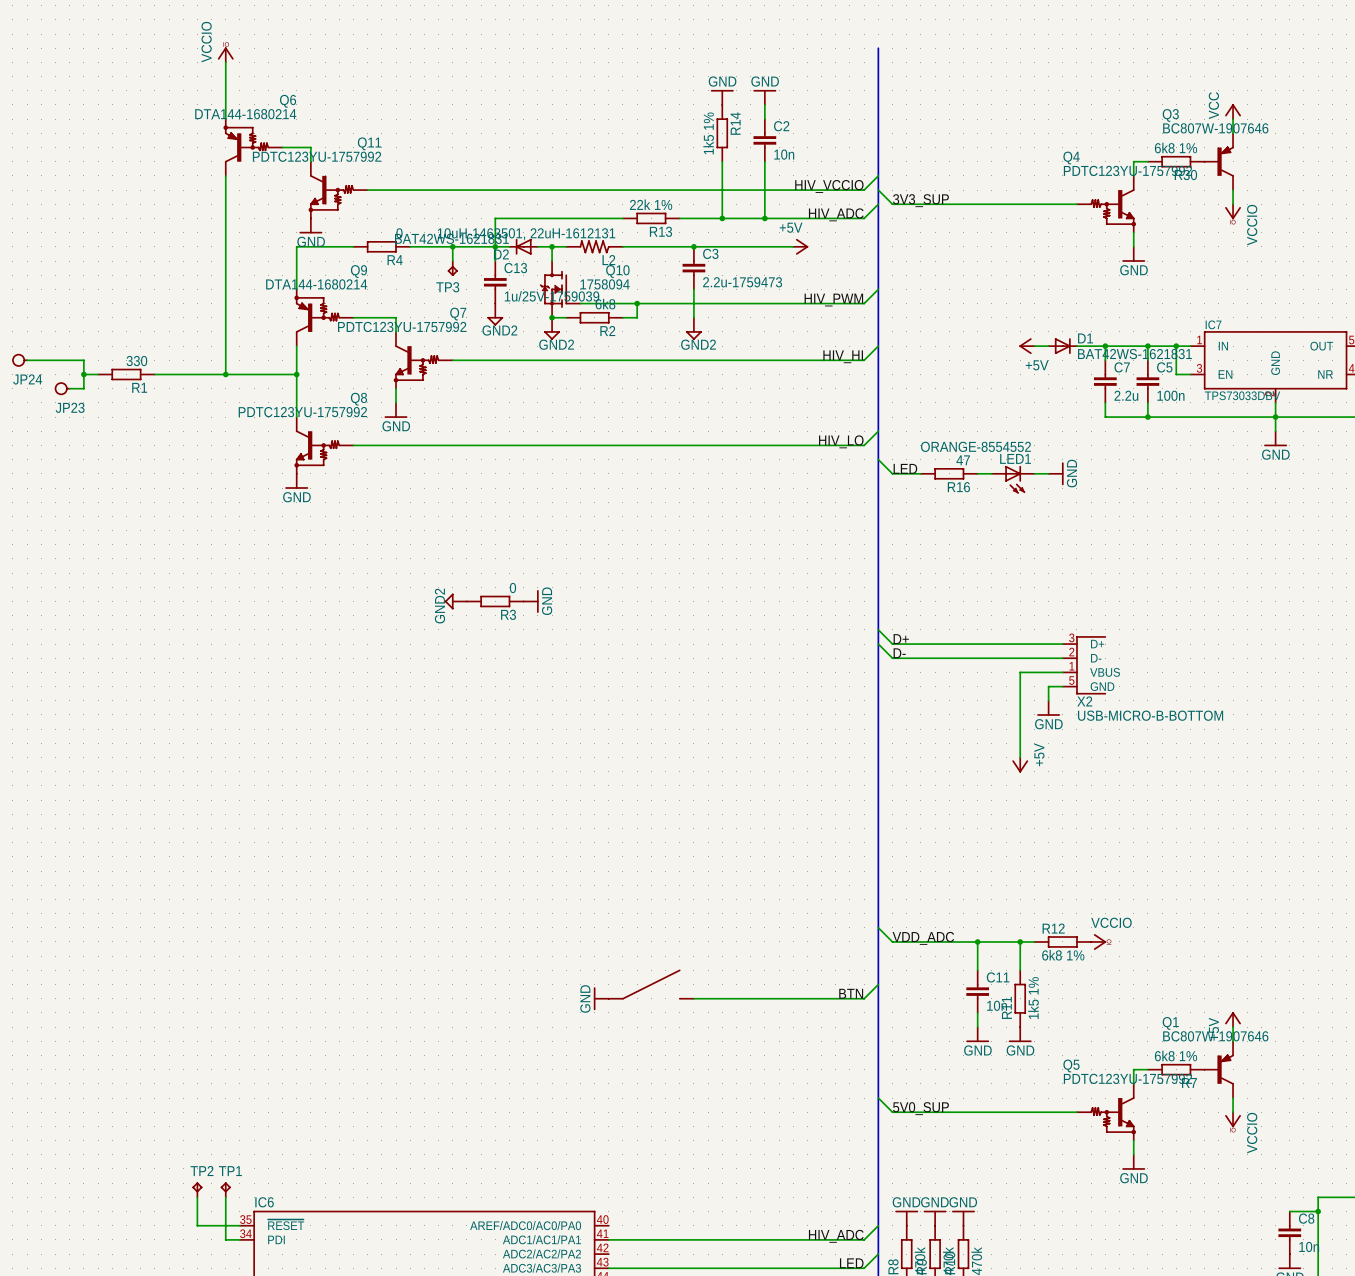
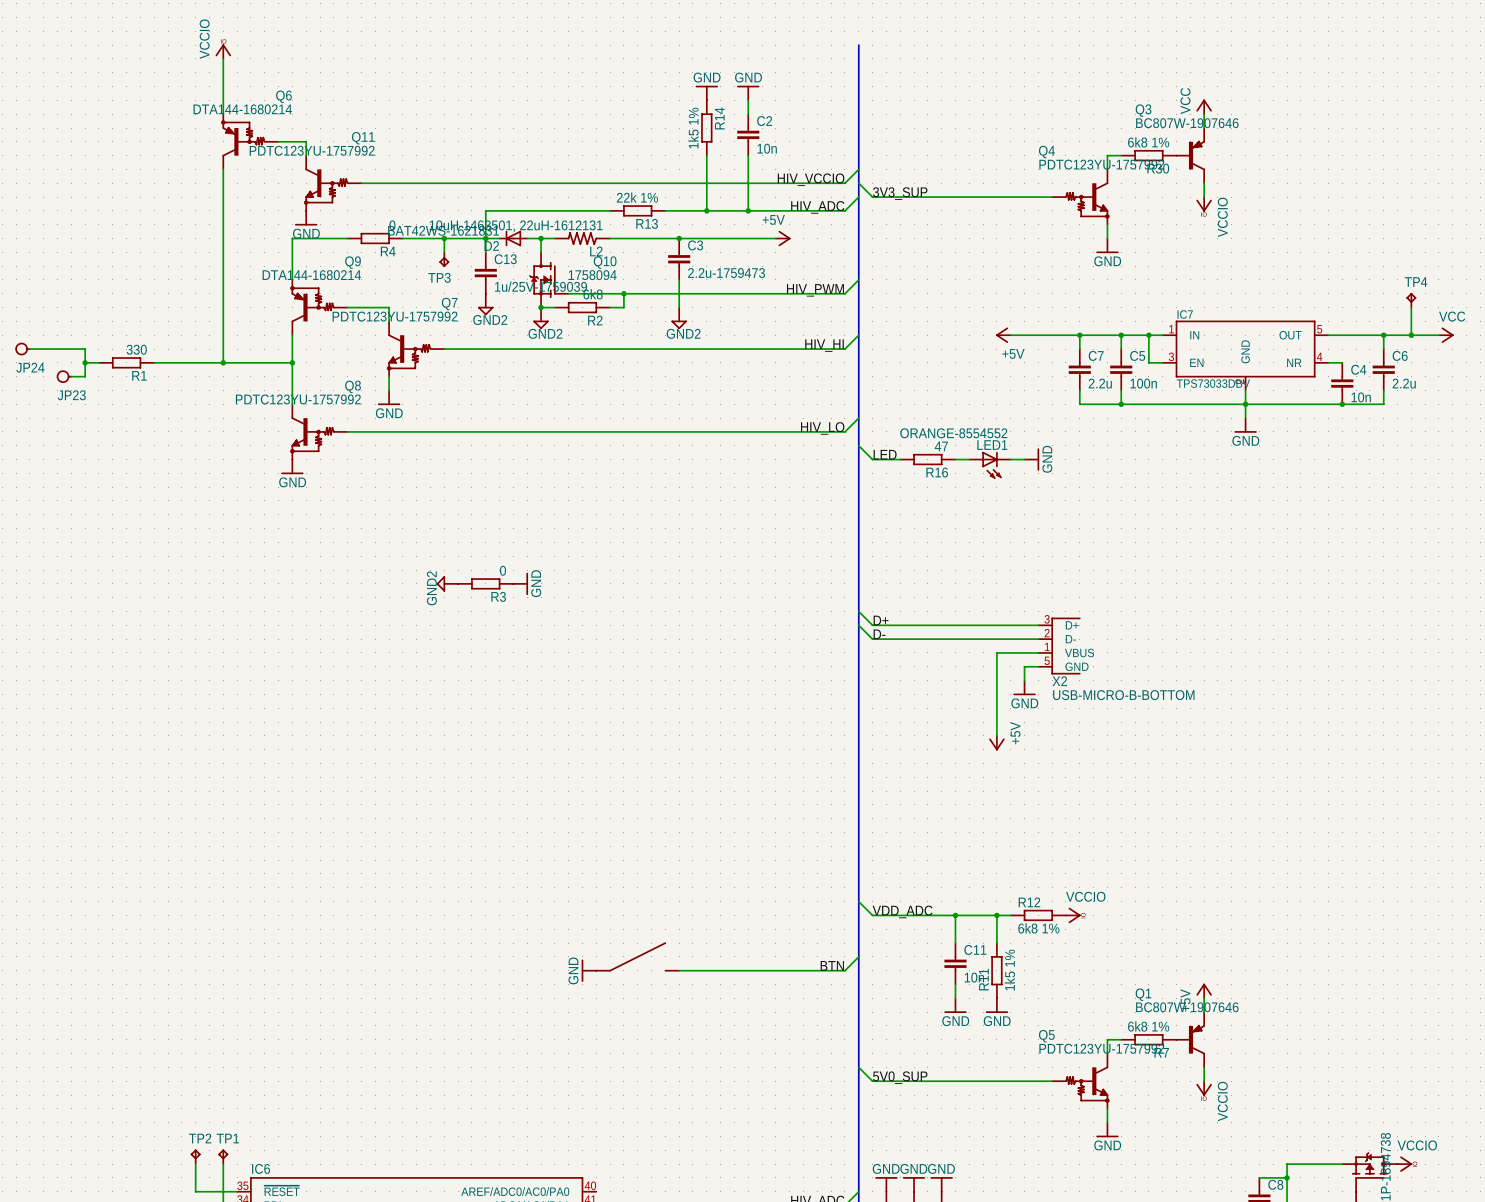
D1: BAT42WS-1621831 (1062, 346) -> none

